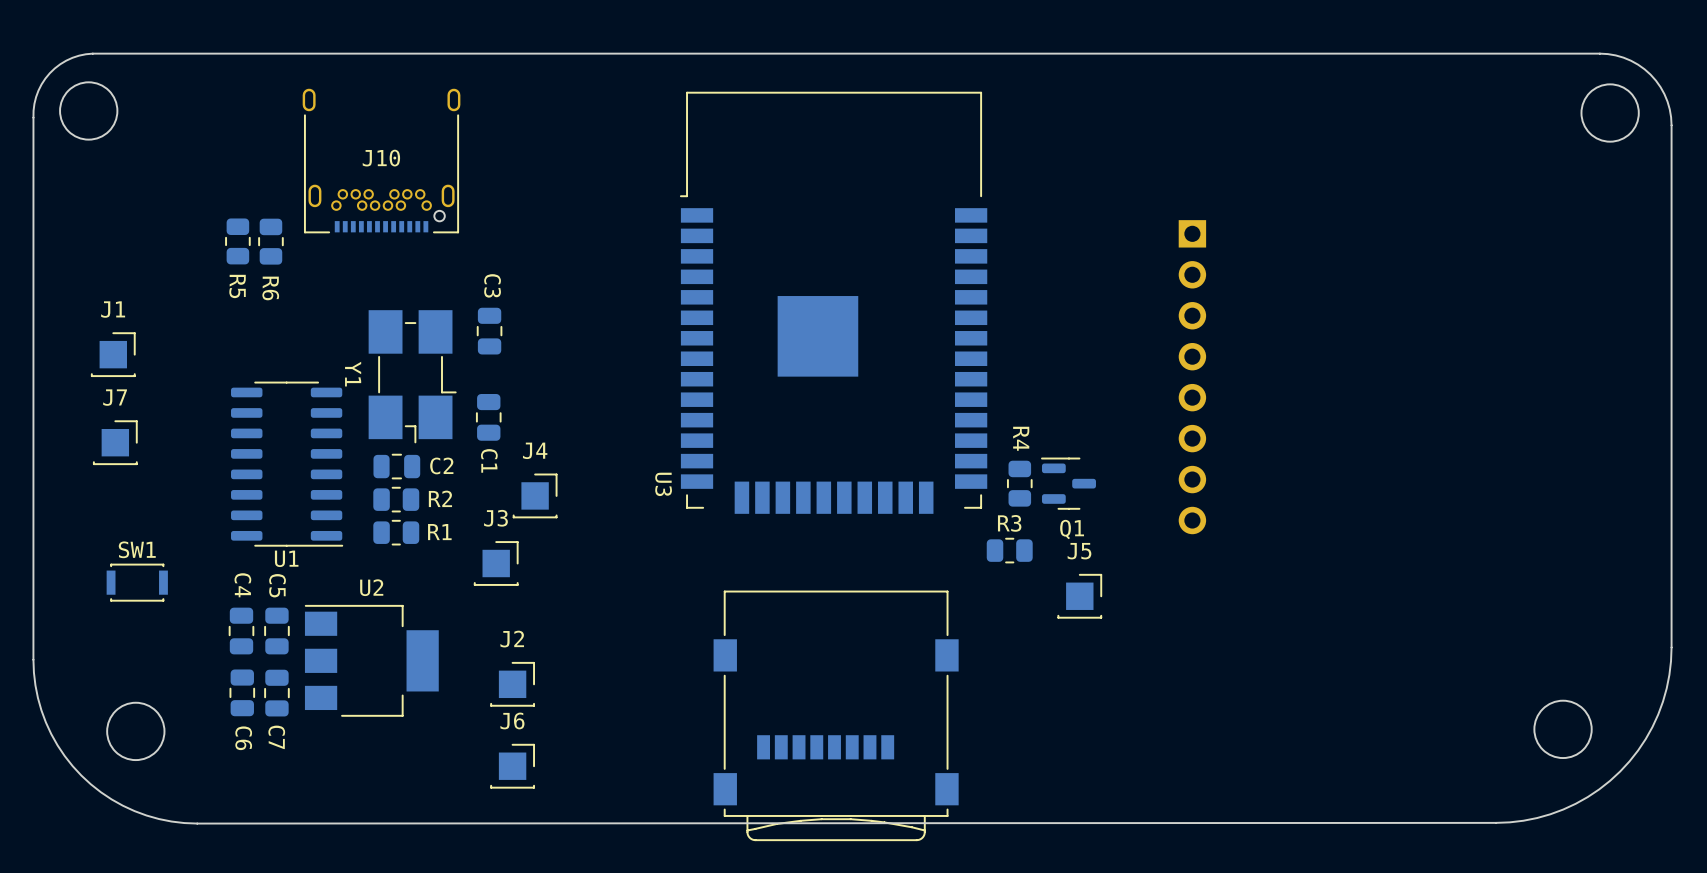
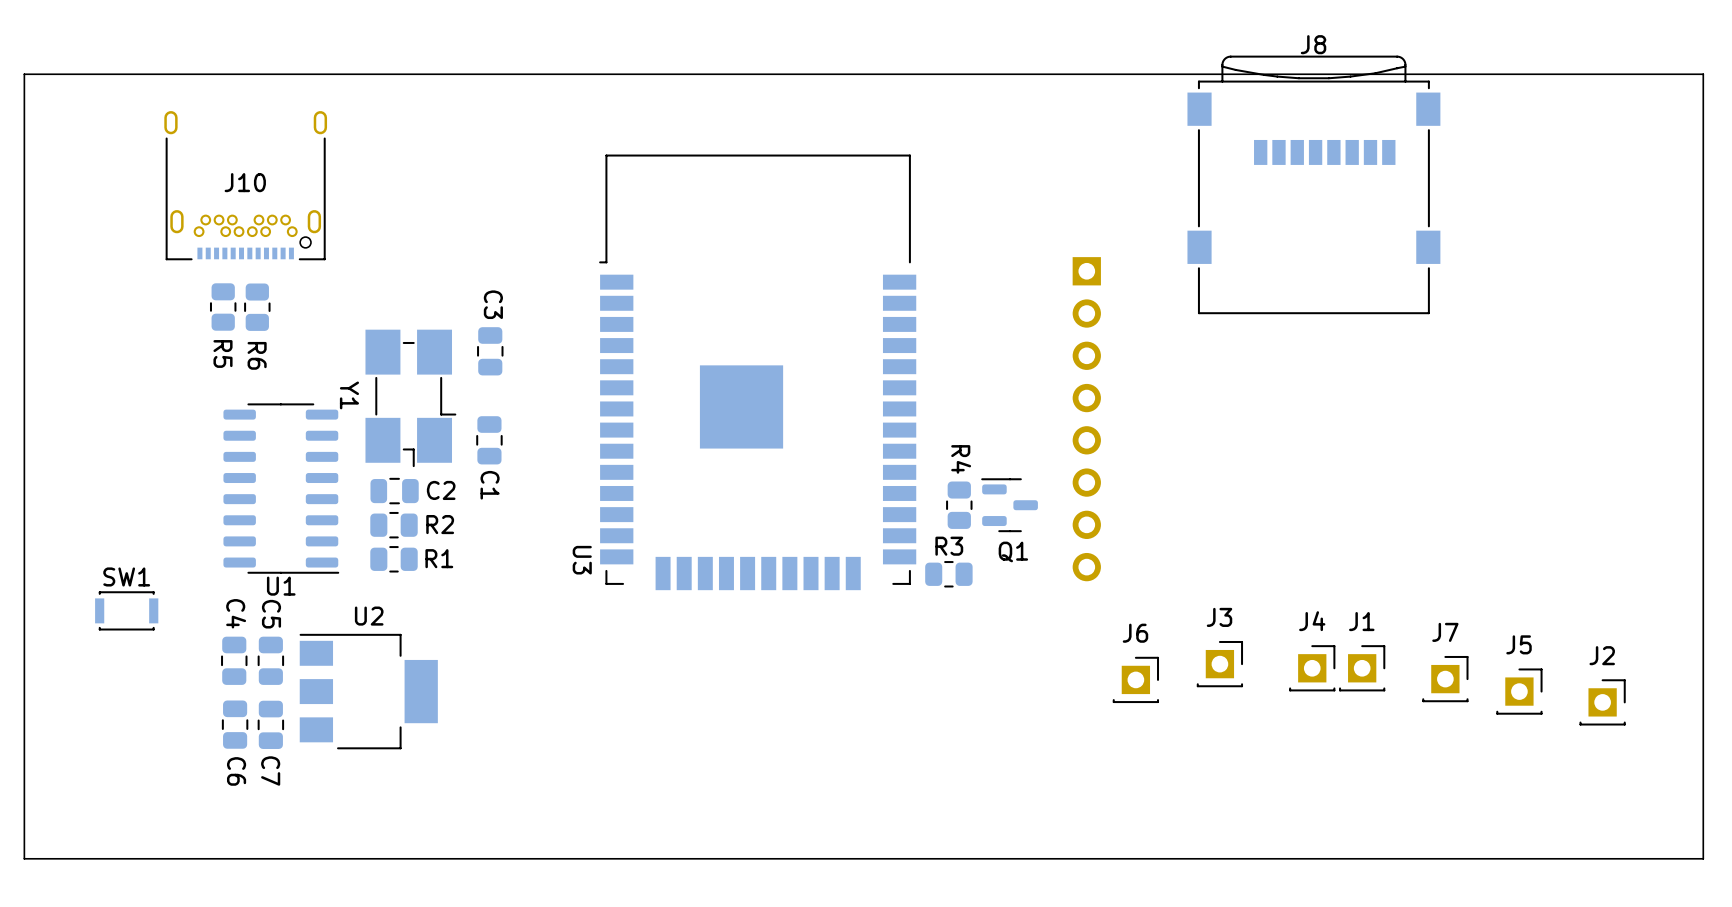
board edge: (1599, 53) (92, 53) (72, 57) (54, 68) (45, 78) (38, 90) (33, 110) (33, 659) (35, 685) (45, 722) (57, 745) (72, 766) (100, 792) (122, 805) (146, 815) (184, 823) (1496, 822) (1537, 818) (1563, 809) (1599, 789) (1620, 771) (1638, 750) (1658, 714) (1666, 688) (1671, 661) (1671, 117) (1664, 94) (1650, 74) (1630, 60) (1615, 55) (1599, 53) -> (1703, 74) (1703, 858) (24, 858) (24, 74) (1703, 74)
round board edge: [59, 81, 119, 141] -> none
round board edge: [1580, 83, 1640, 143] -> none
J10 position: (381, 161) -> (245, 185)
J8: none -> (1313, 184)
R5 position: (237, 241) -> (223, 306)
R6 position: (270, 241) -> (257, 307)
U3 position: (833, 302) -> (757, 372)
J1 footprint: [90, 332, 136, 378] -> [1339, 645, 1386, 692]
part position: (1192, 377) -> (1086, 419)
J7 footprint: [92, 420, 138, 466] -> [1422, 655, 1469, 703]
J4 footprint: [512, 473, 558, 519] -> [1289, 645, 1336, 692]
R4 position: (1019, 483) -> (959, 505)
Q1 position: (1068, 483) -> (1009, 505)
J3 footprint: [473, 541, 519, 586] -> [1196, 640, 1244, 688]
R3 position: (1009, 550) -> (948, 574)
J5 footprint: [1057, 573, 1103, 619] -> [1496, 668, 1543, 715]
J2 footprint: [490, 661, 535, 707] -> [1579, 679, 1626, 726]
round board edge: [1533, 699, 1593, 759] -> none
round board edge: [106, 701, 166, 761] -> none
part: (836, 715) -> none
J6 footprint: [490, 743, 535, 789] -> [1112, 656, 1160, 704]

